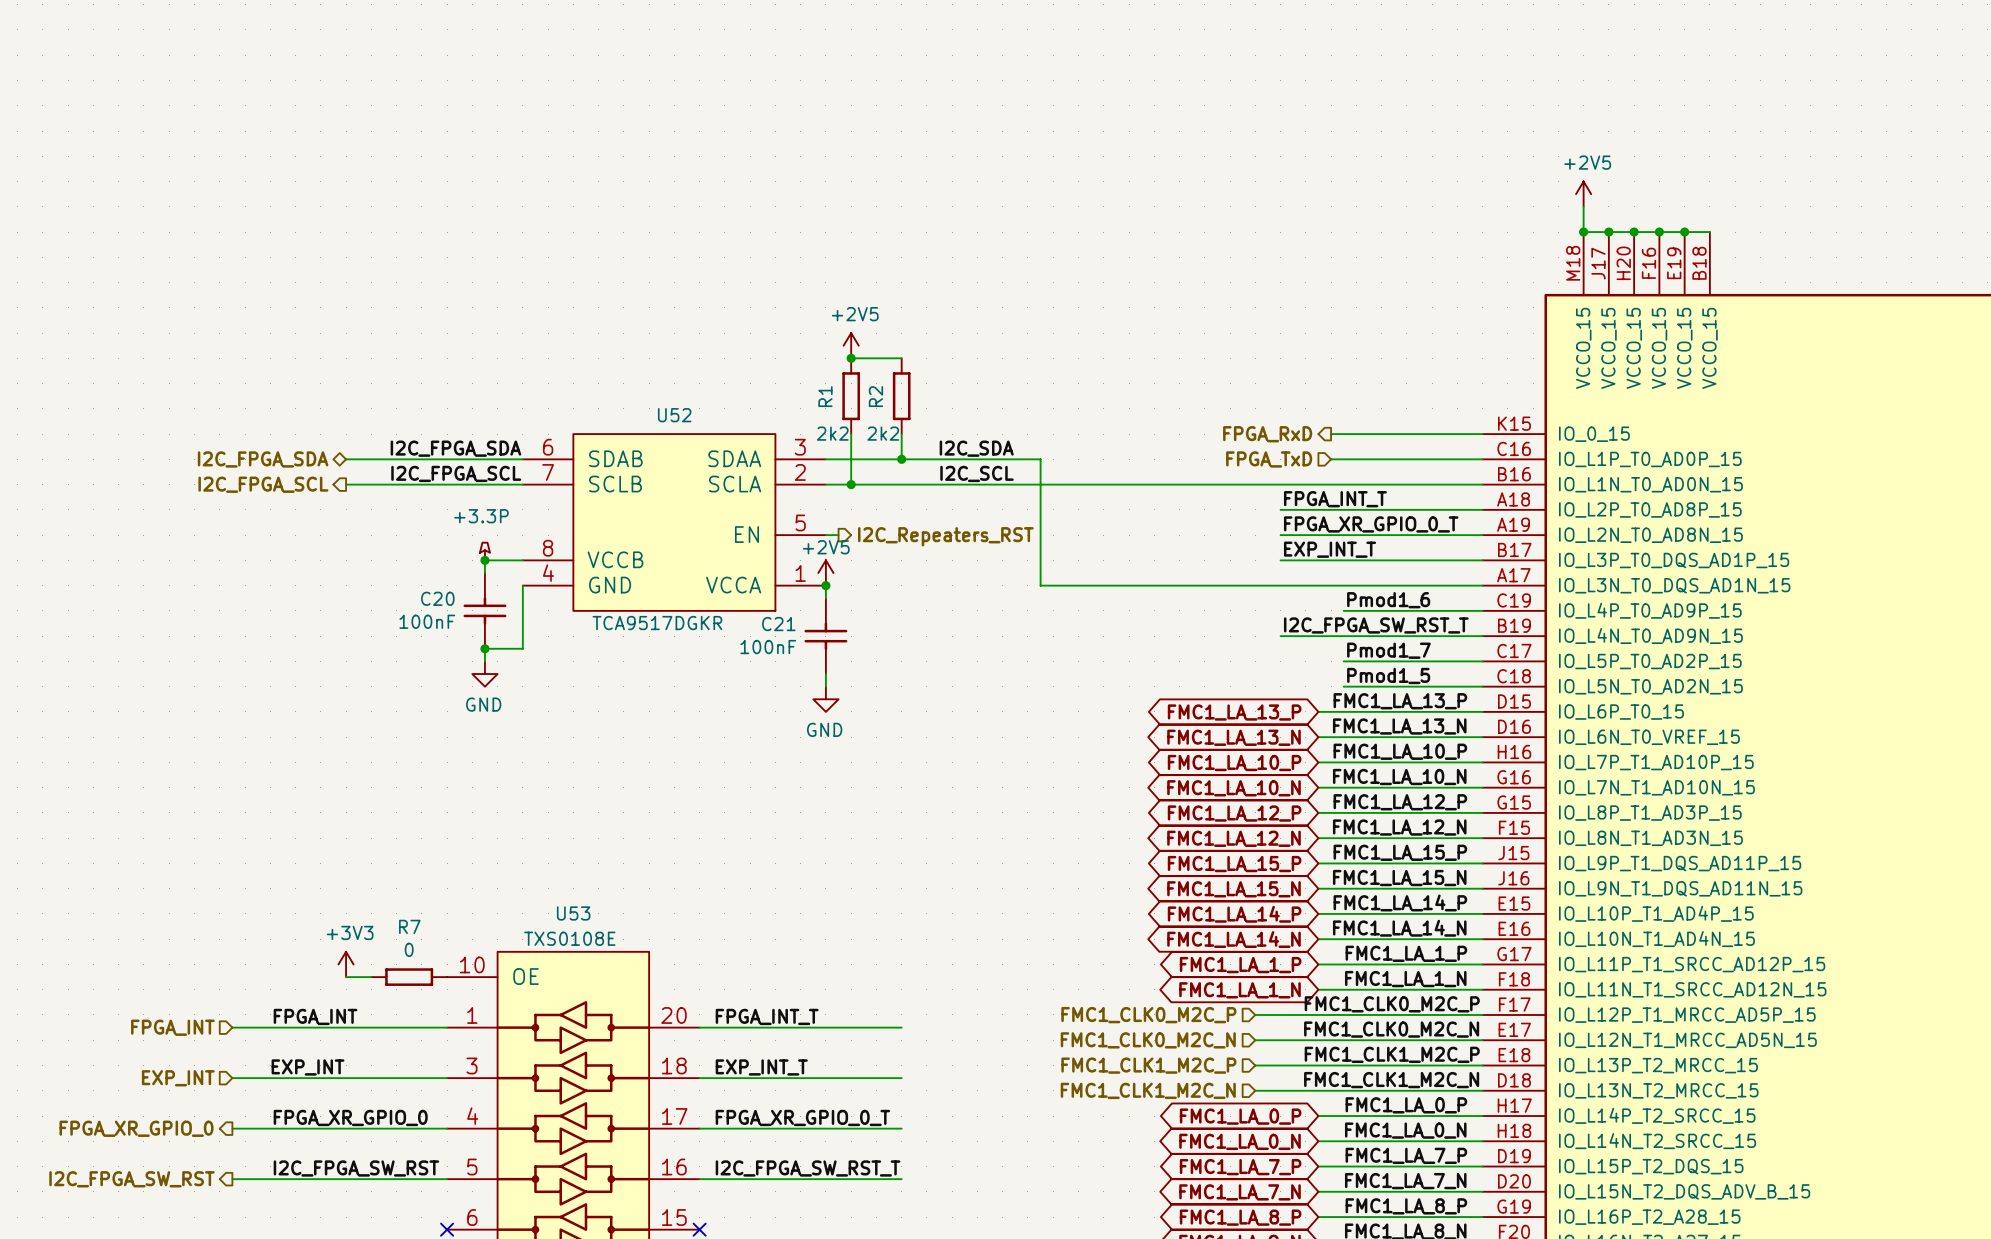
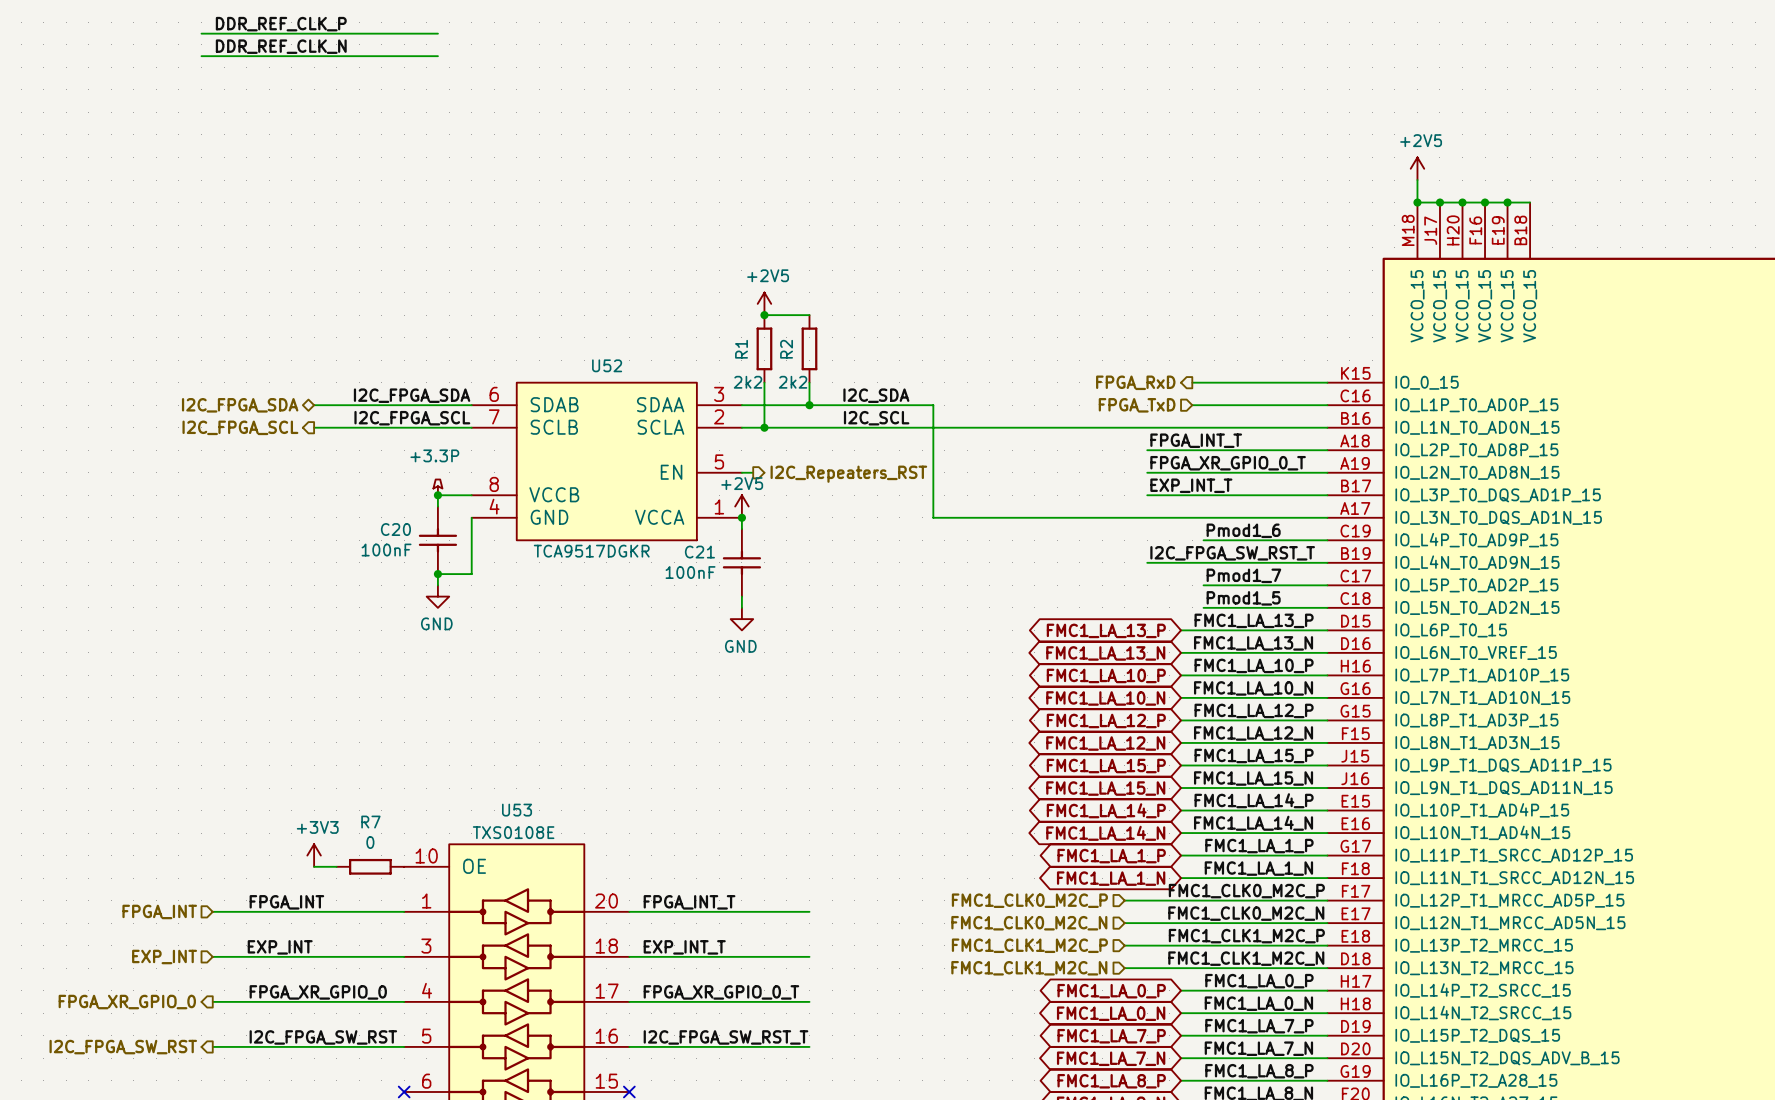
label: none -> DDR_REF_CLK_P (281, 24)
wire: none -> (201, 33) (437, 33)
label: none -> DDR_REF_CLK_N (281, 46)
wire: none -> (201, 56) (437, 56)

